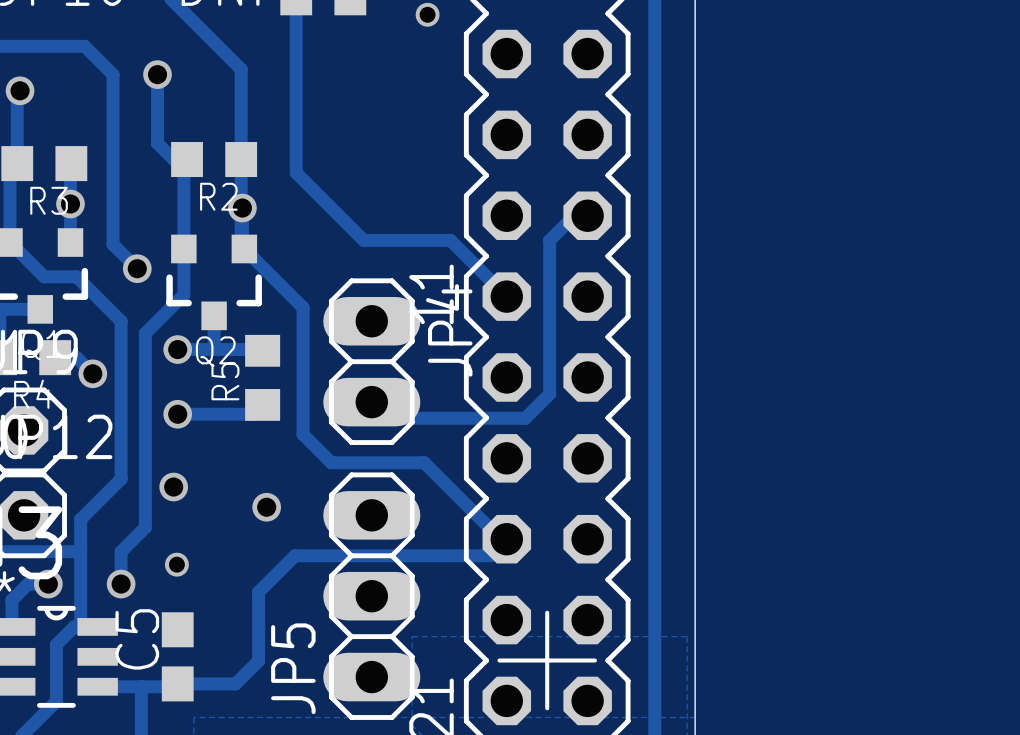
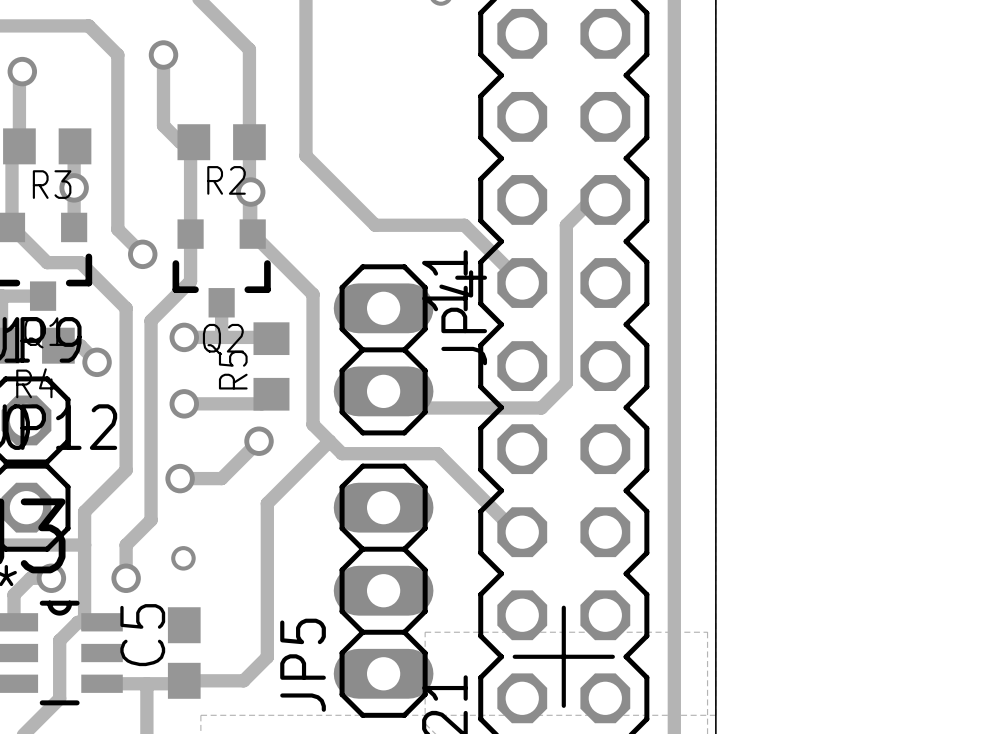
track: none -> (259, 441) (221, 478) (180, 478)
via position: (266, 507) -> (259, 441)
track: (500, 539) (506, 539) (490, 555) (294, 555) (258, 592) -> (329, 441) (267, 503) (267, 586)

